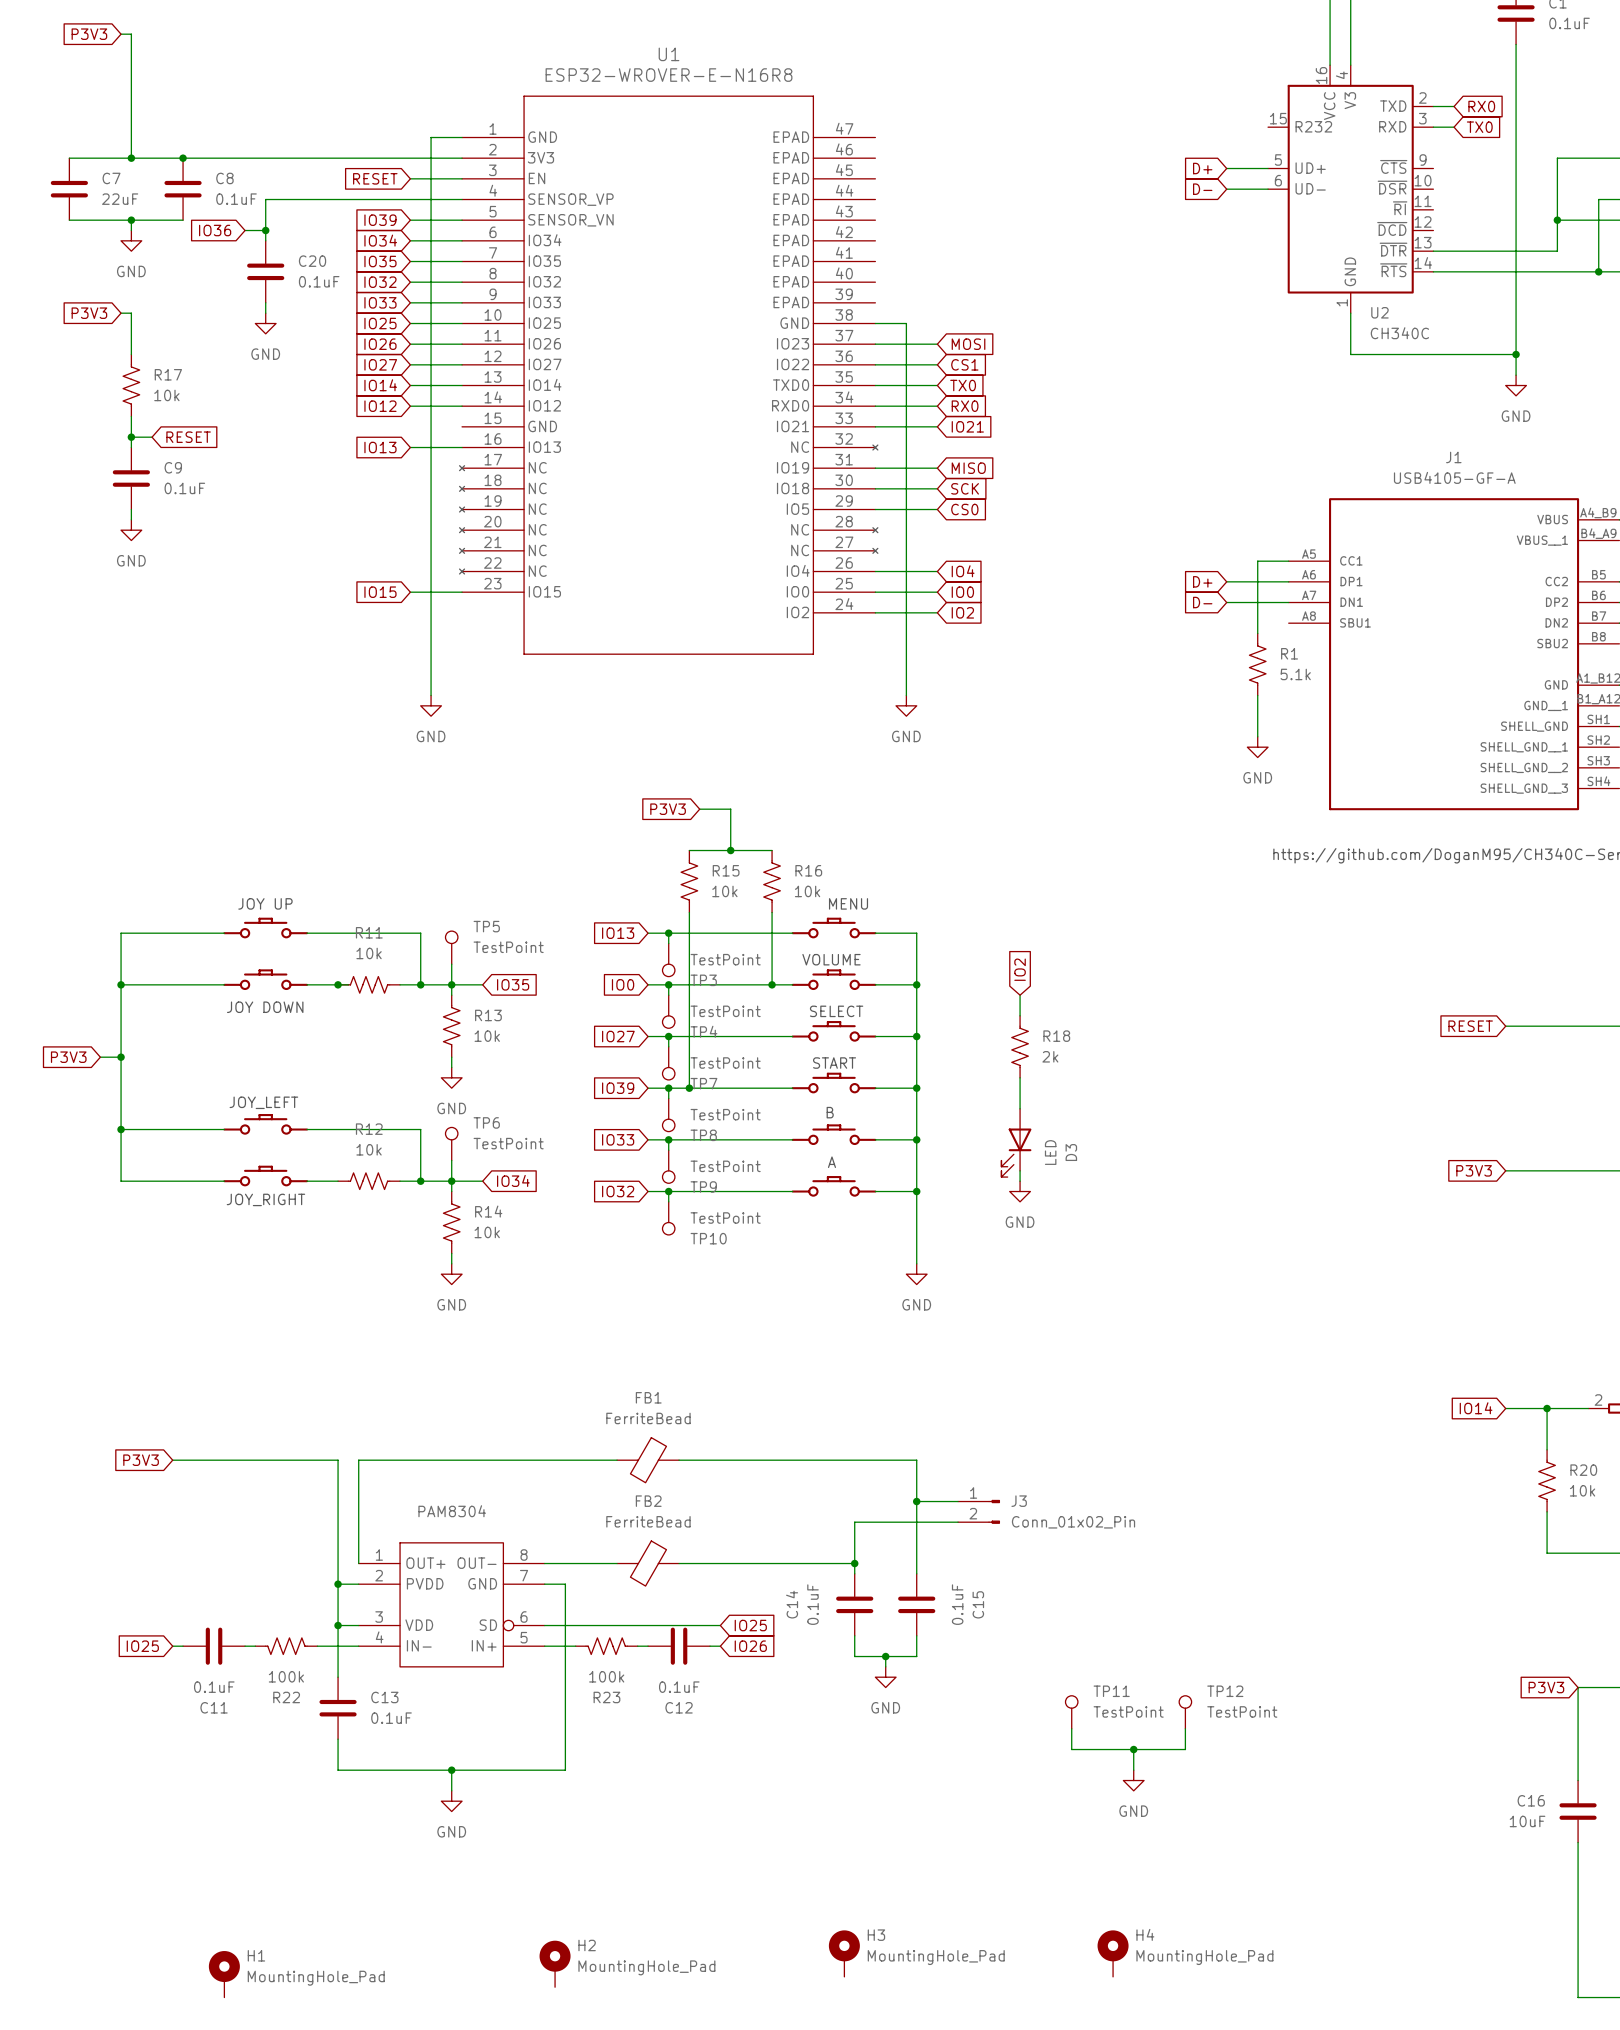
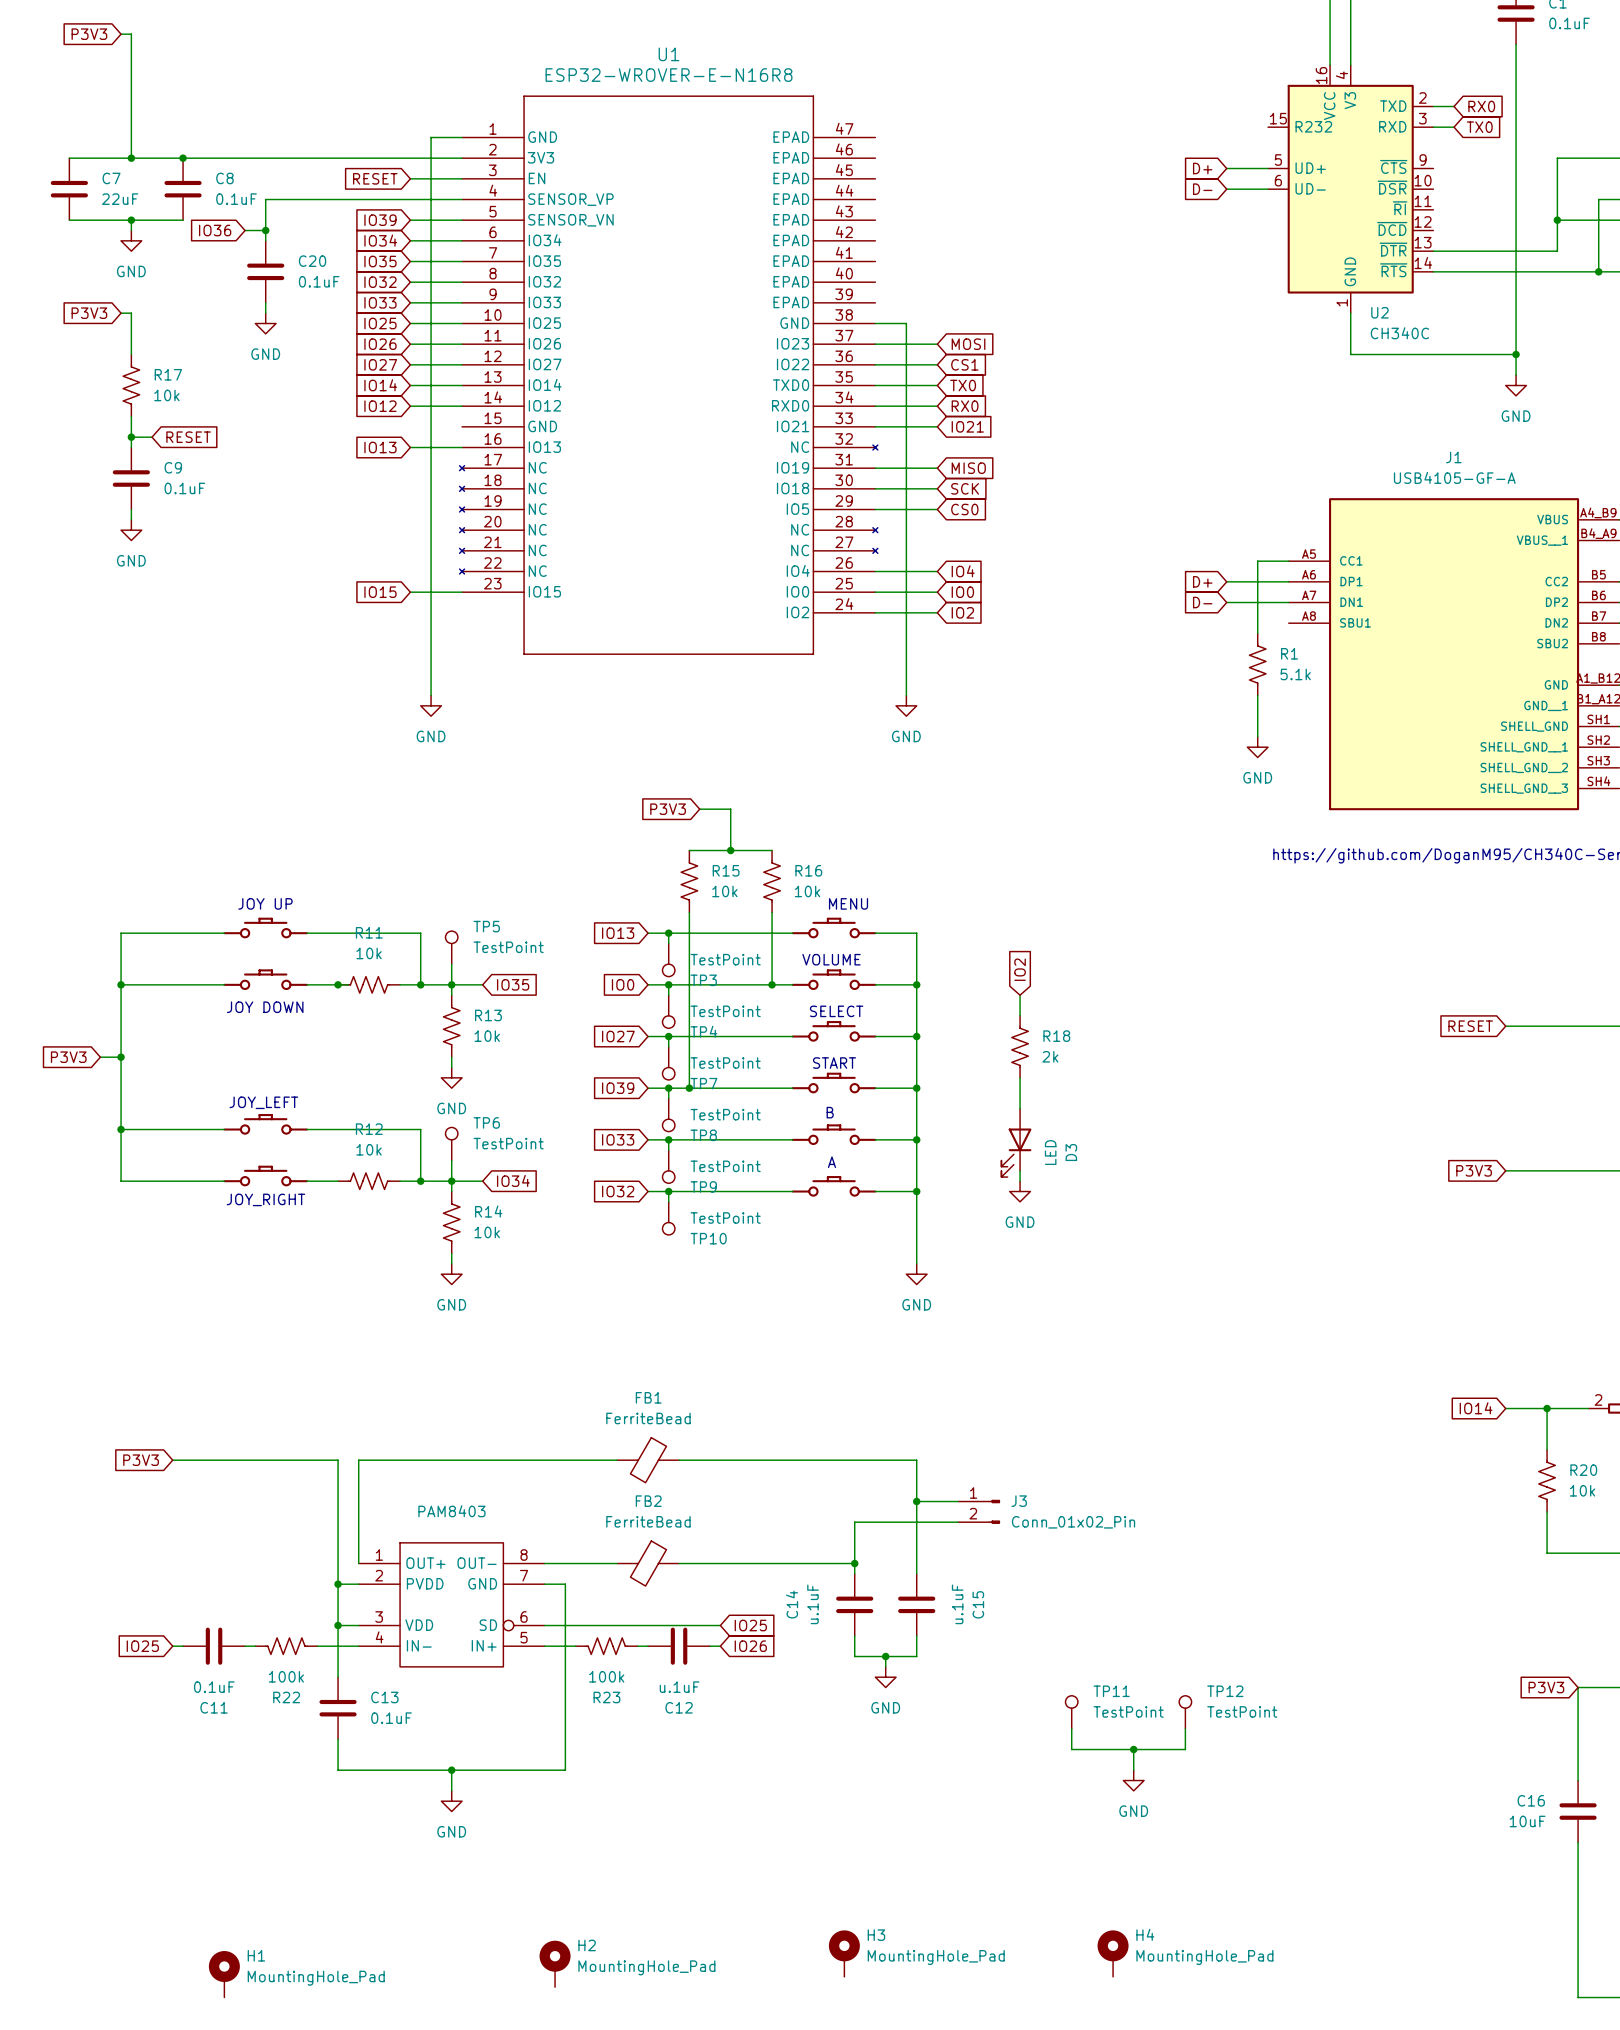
PAM8304 name: PAM8304 (452, 1511) -> PAM8403 (451, 1511)
C14 value: 0.1uF (812, 1604) -> u.1uF (812, 1604)
C15 value: 0.1uF (957, 1604) -> u.1uF (957, 1604)
C12 value: 0.1uF (679, 1687) -> u.1uF (679, 1687)

